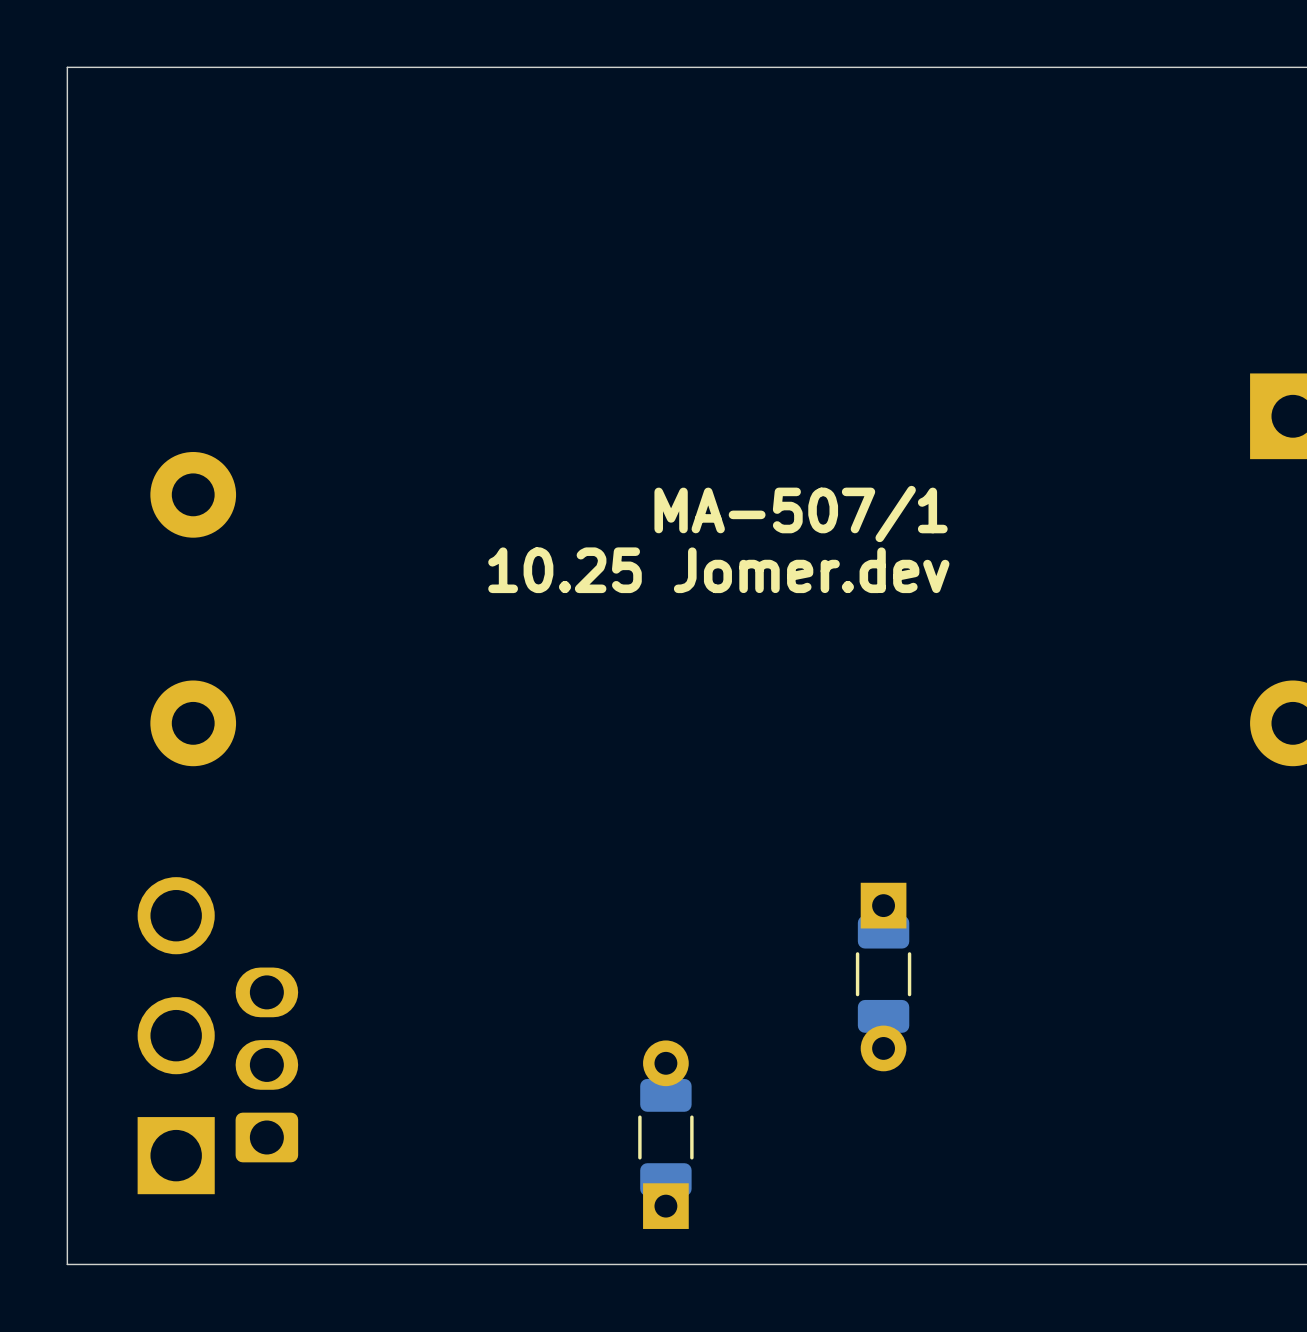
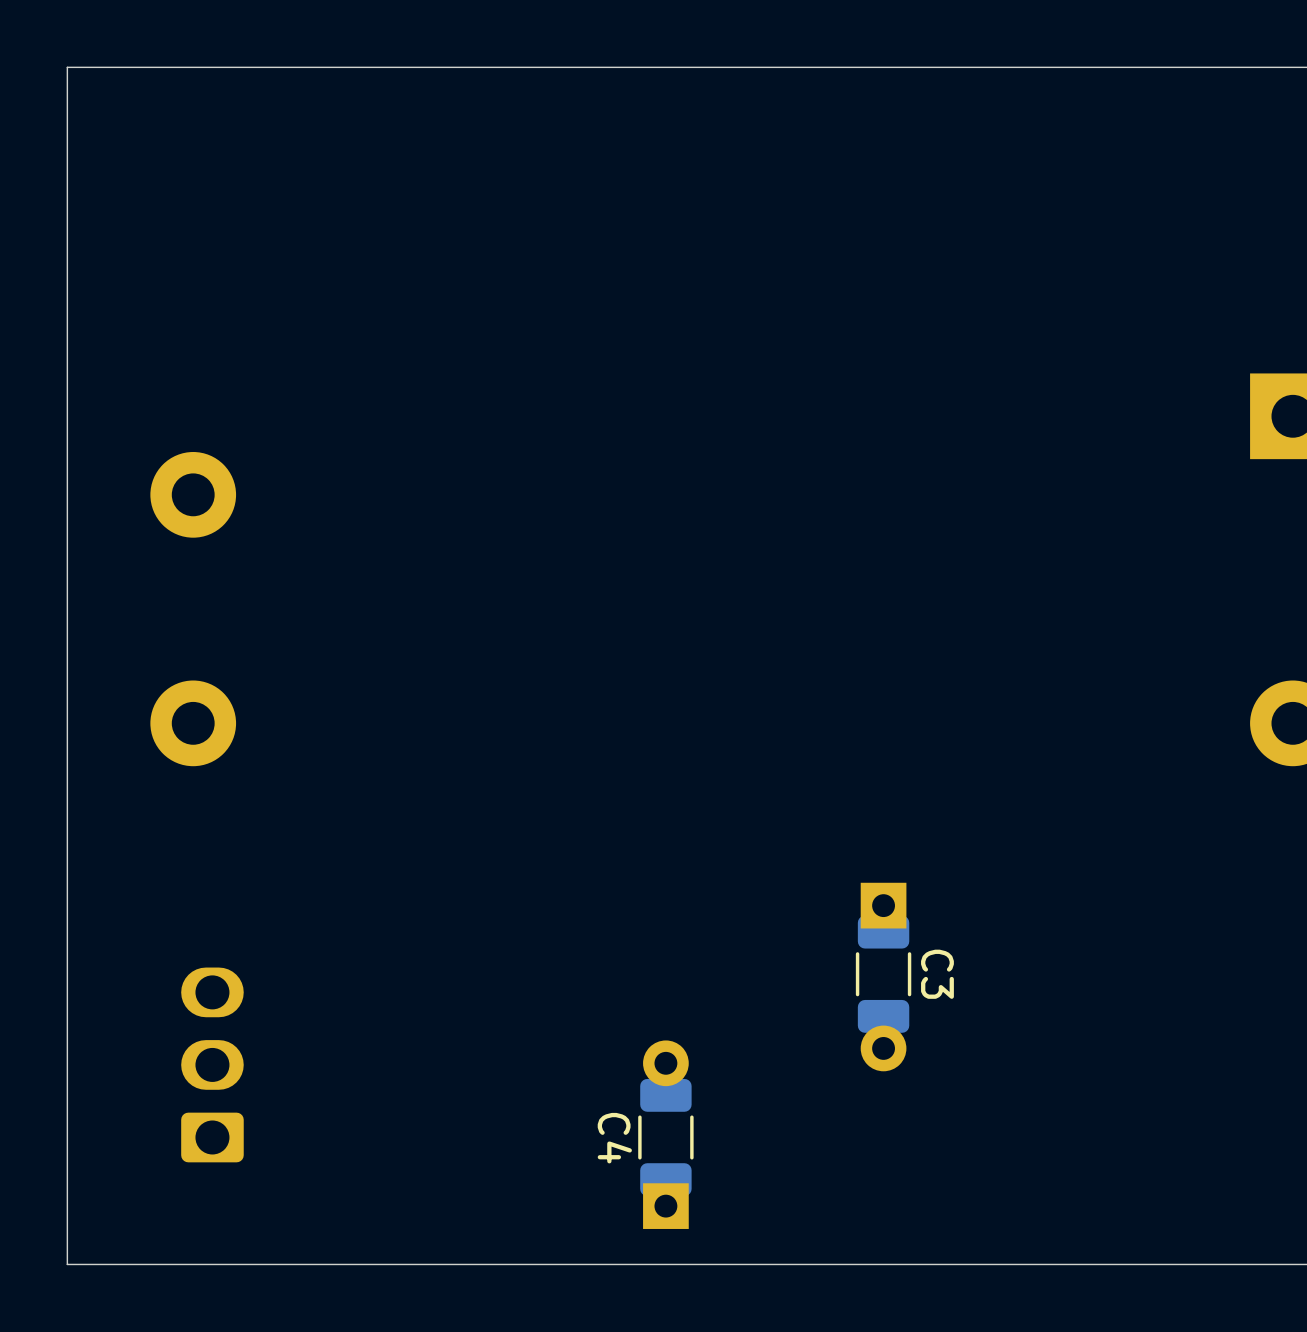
text: MA-507/1 (801, 513) -> none
text: 10.25 Jomer.dev (718, 570) -> none
C3 name: none -> C3 (937, 974)
part: (176, 1035) -> none
part position: (266, 1064) -> (212, 1064)
C4 name: none -> C4 (614, 1138)

